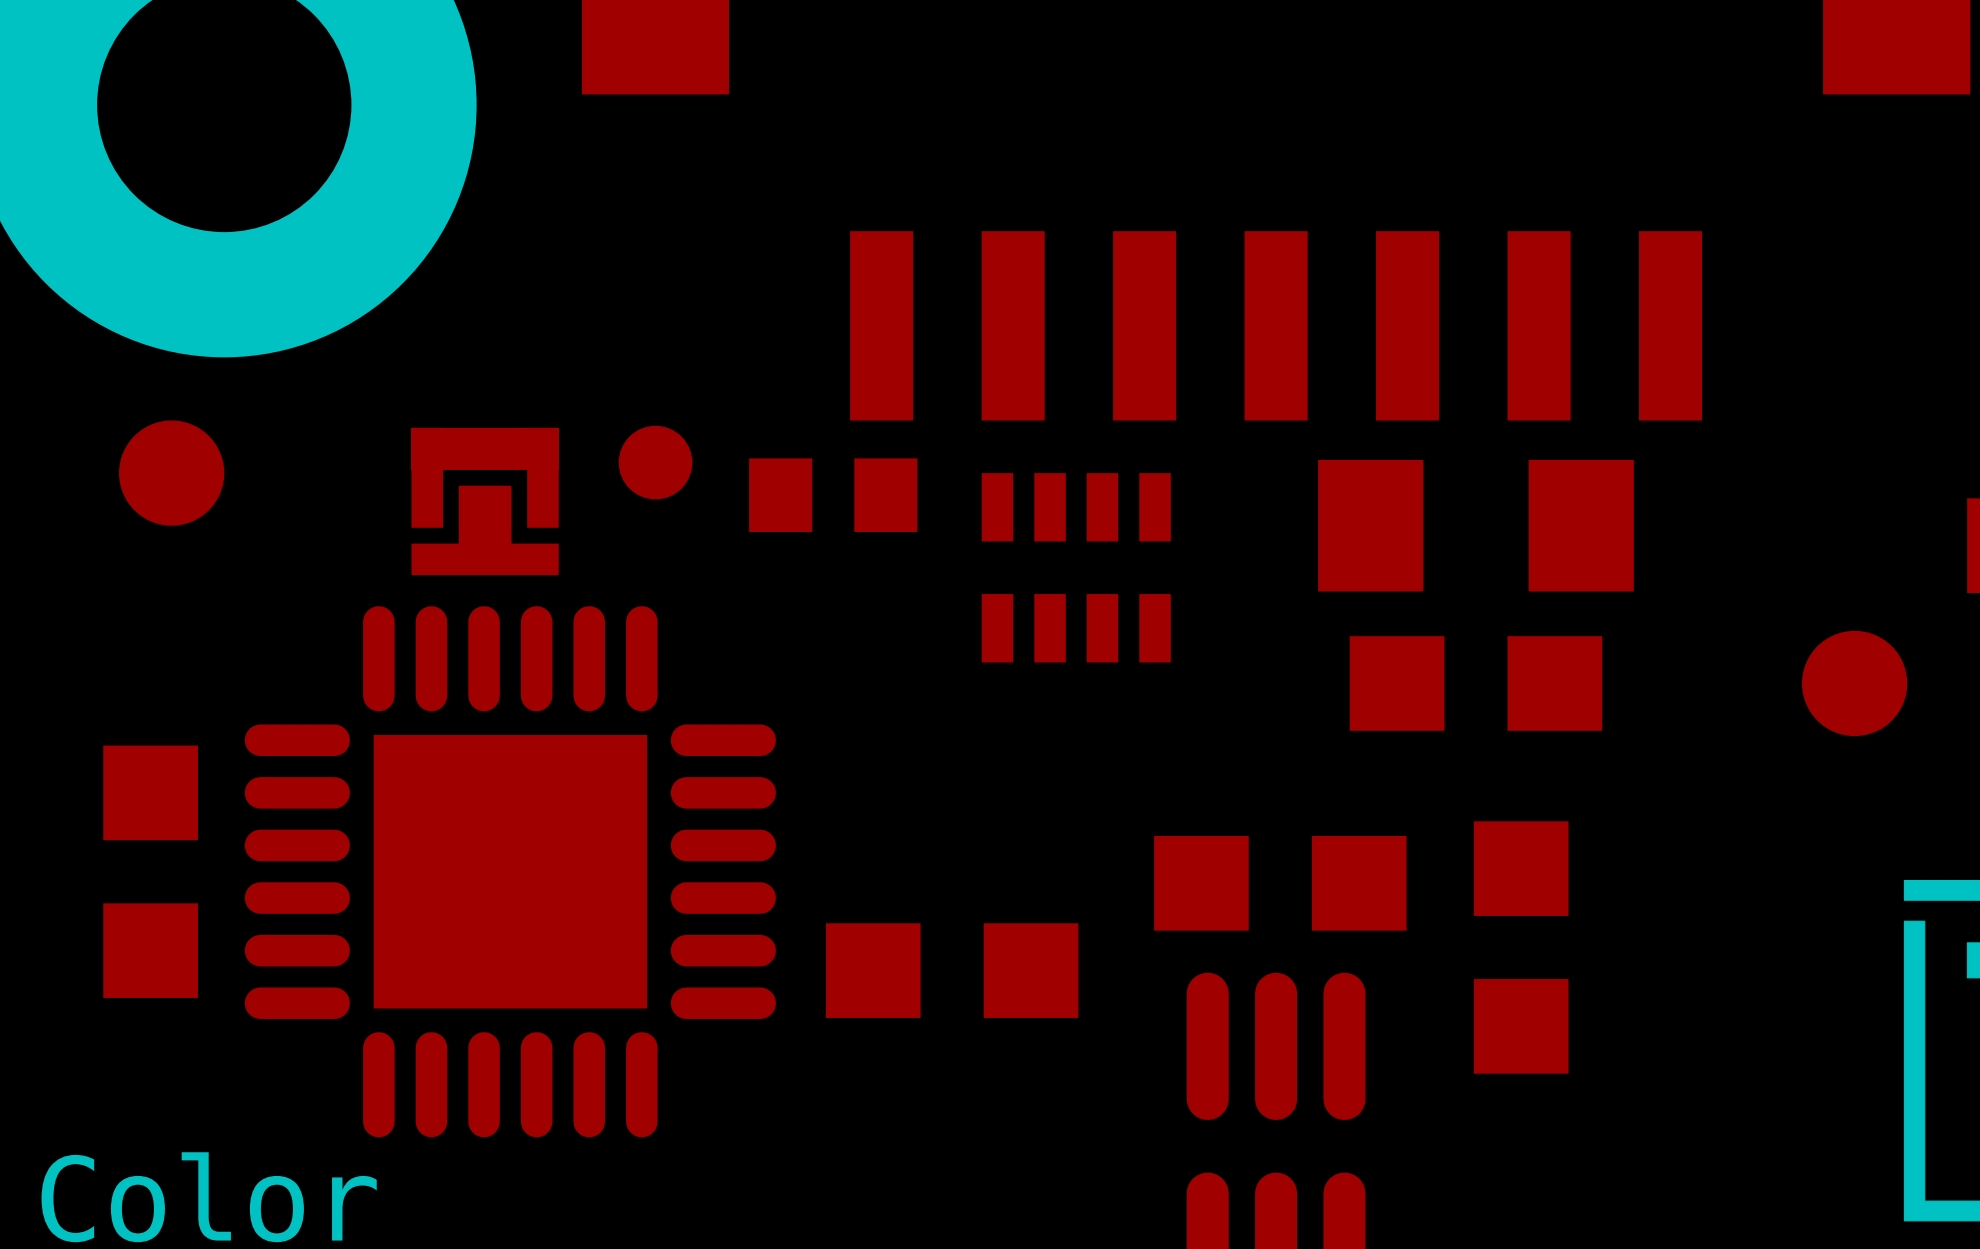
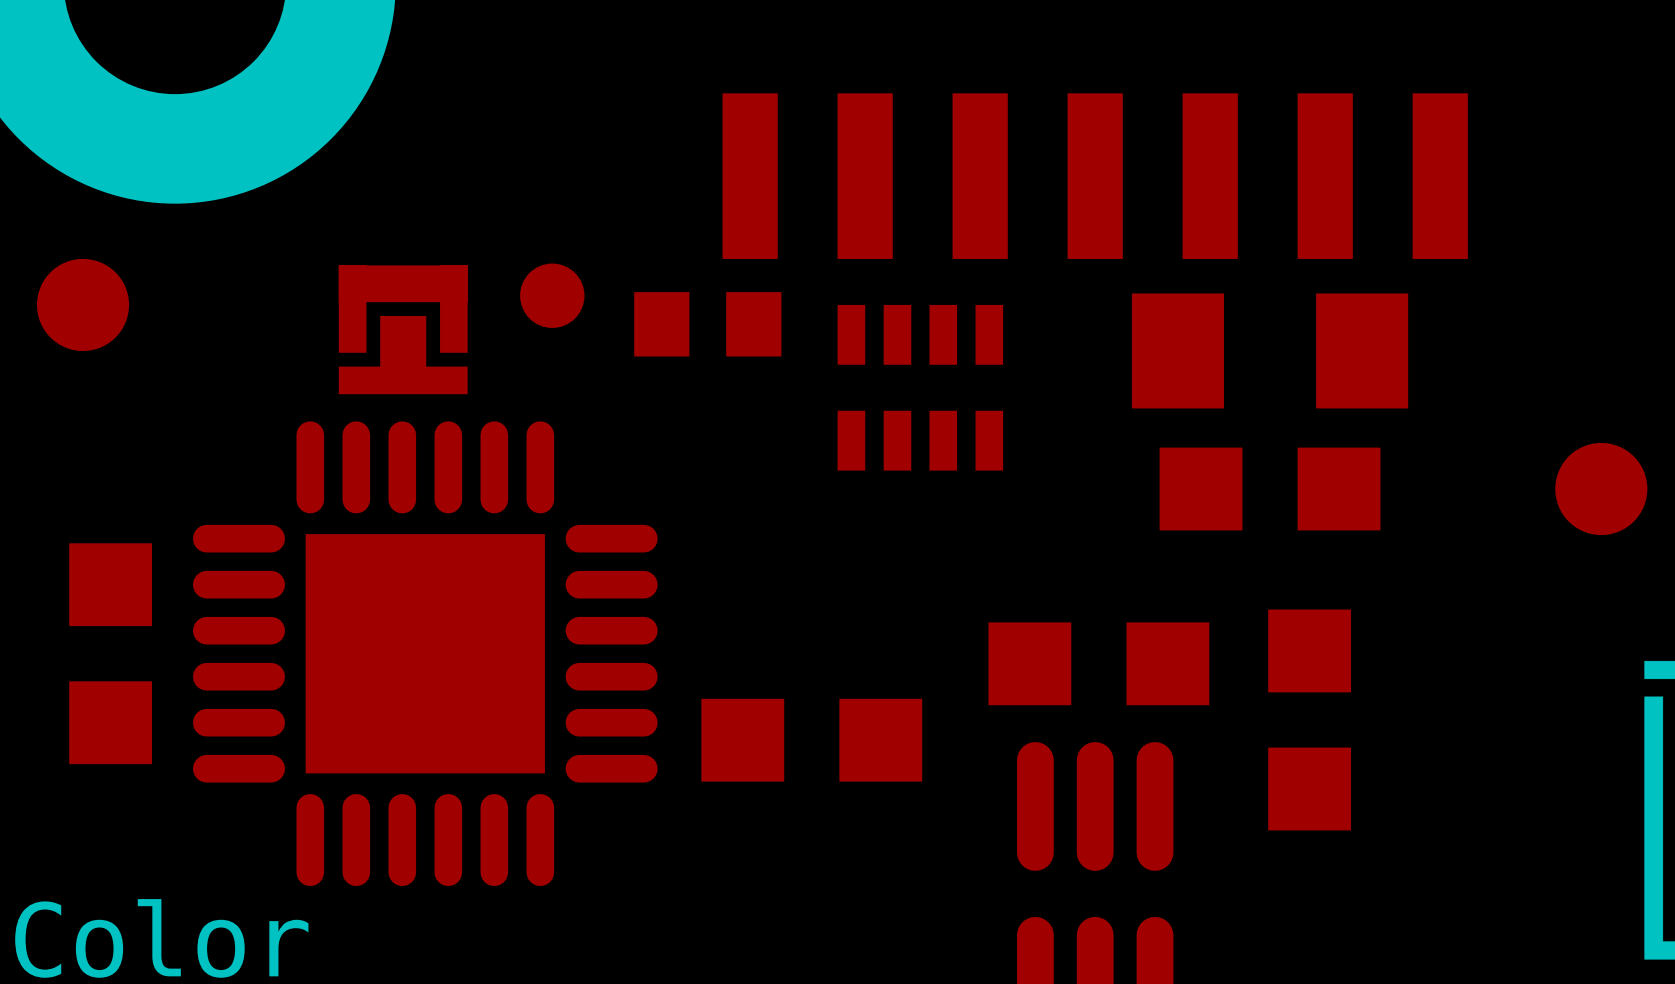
part position: (171, 473) -> (83, 304)

